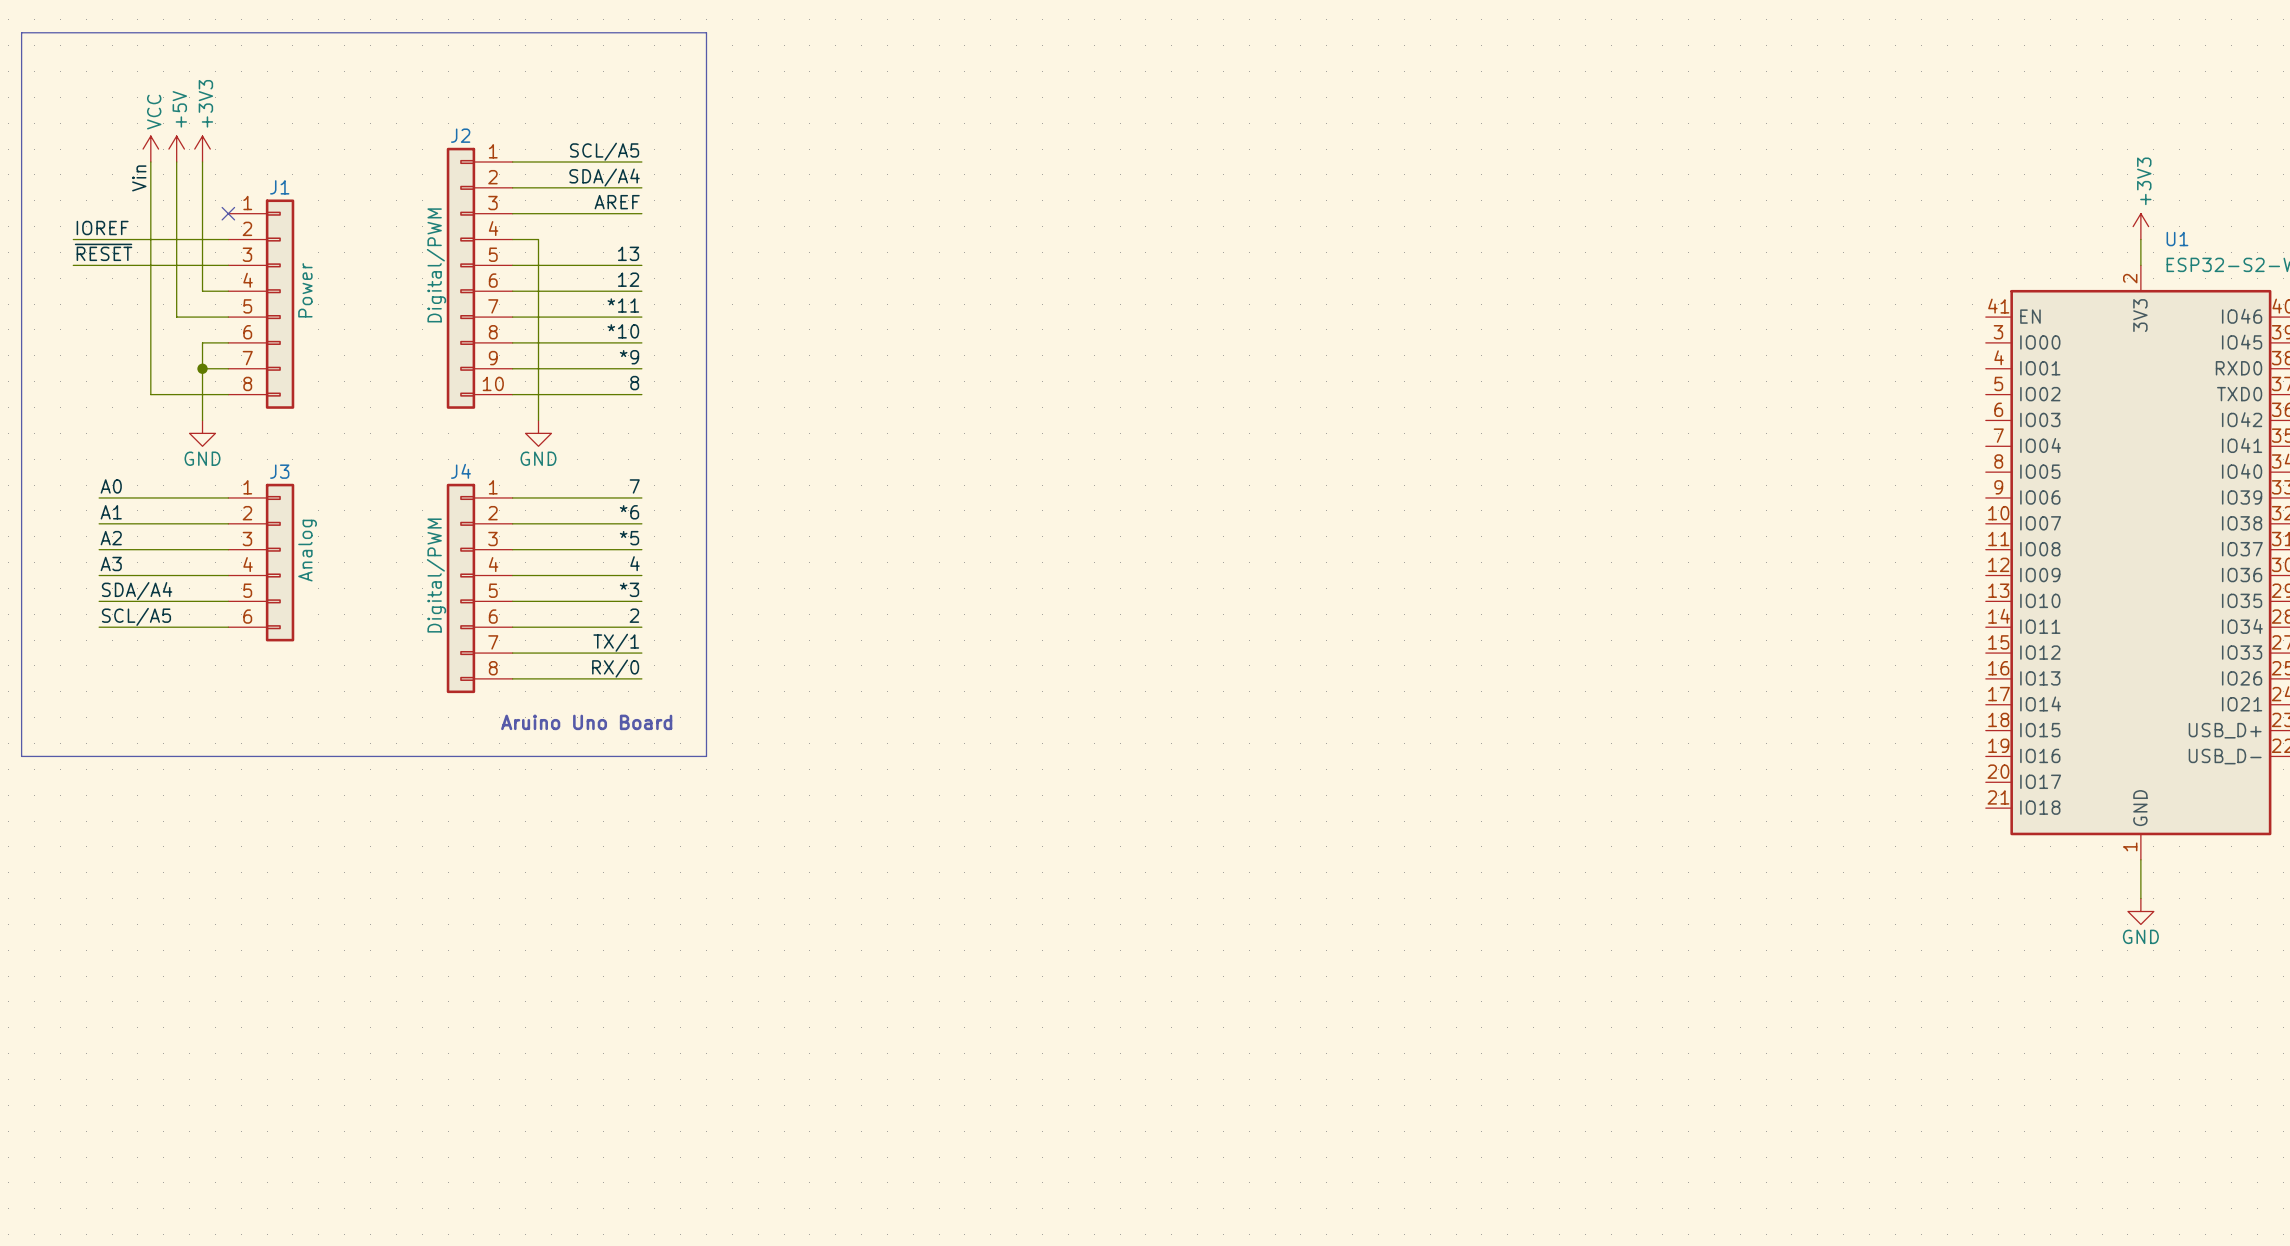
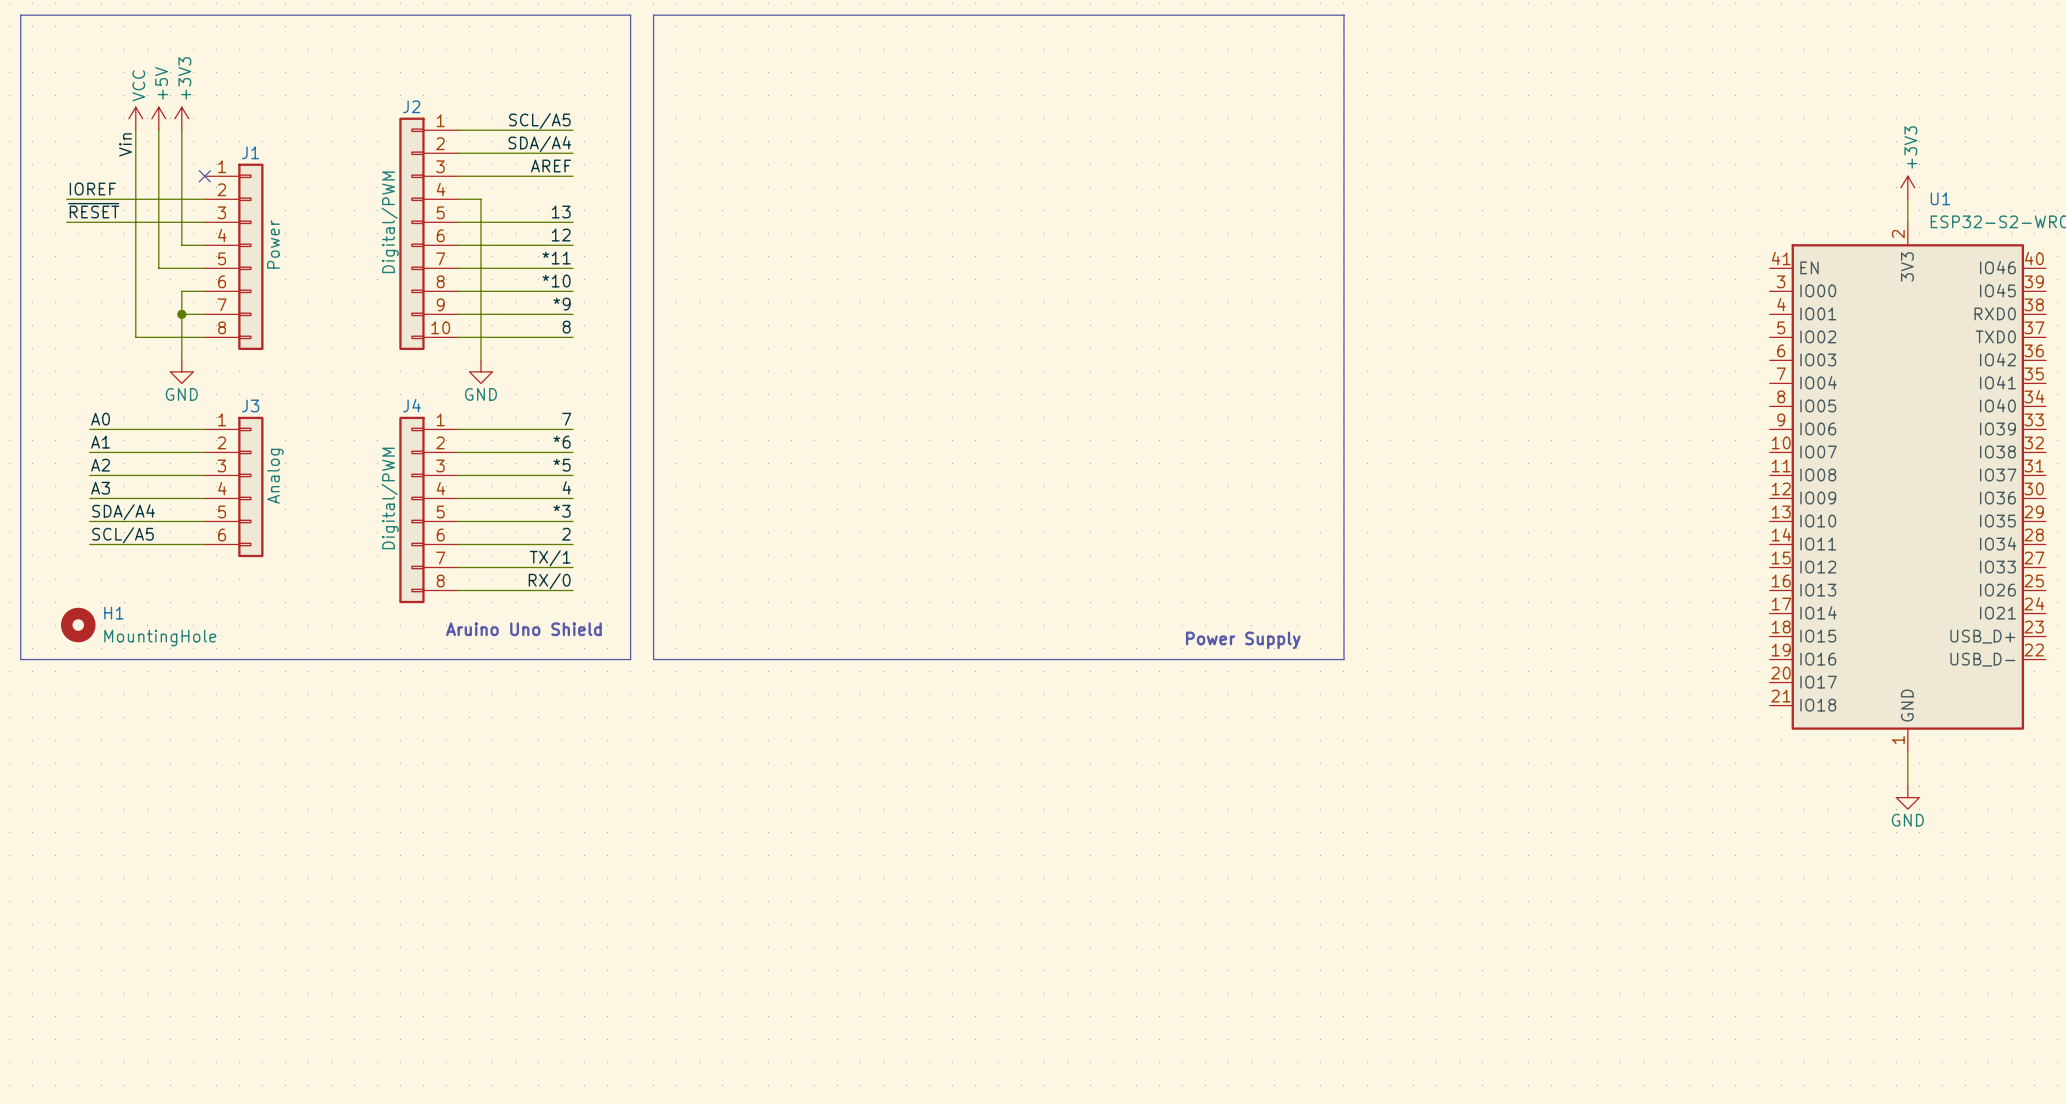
line: none -> (653, 15) (1343, 15) (1343, 659) (653, 659) (653, 15)
H1: none -> MountingHole (78, 625)
text: Aruino Uno Board (586, 722) -> Aruino Uno Shield (523, 629)
text: none -> Power Supply (1243, 640)

